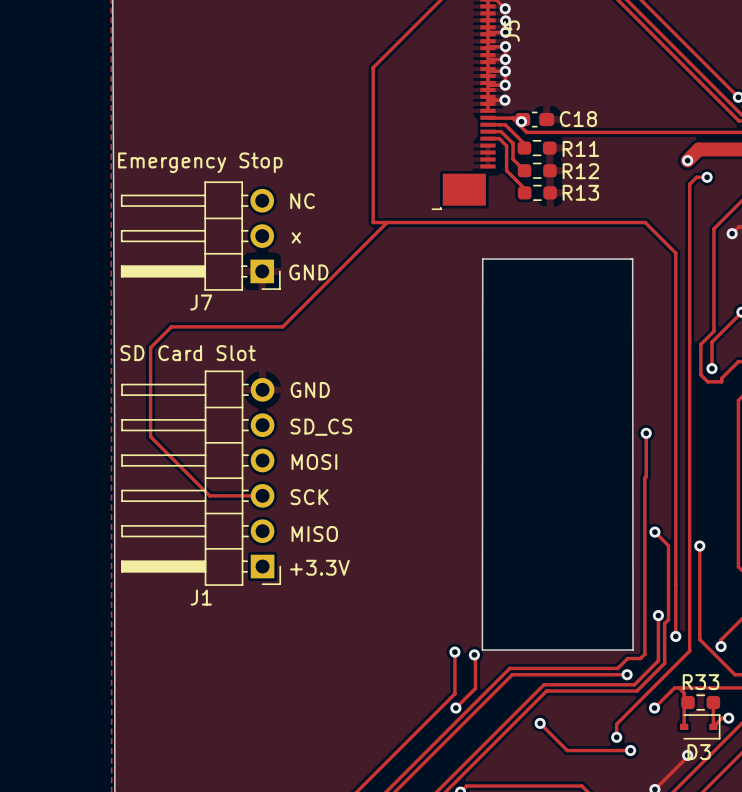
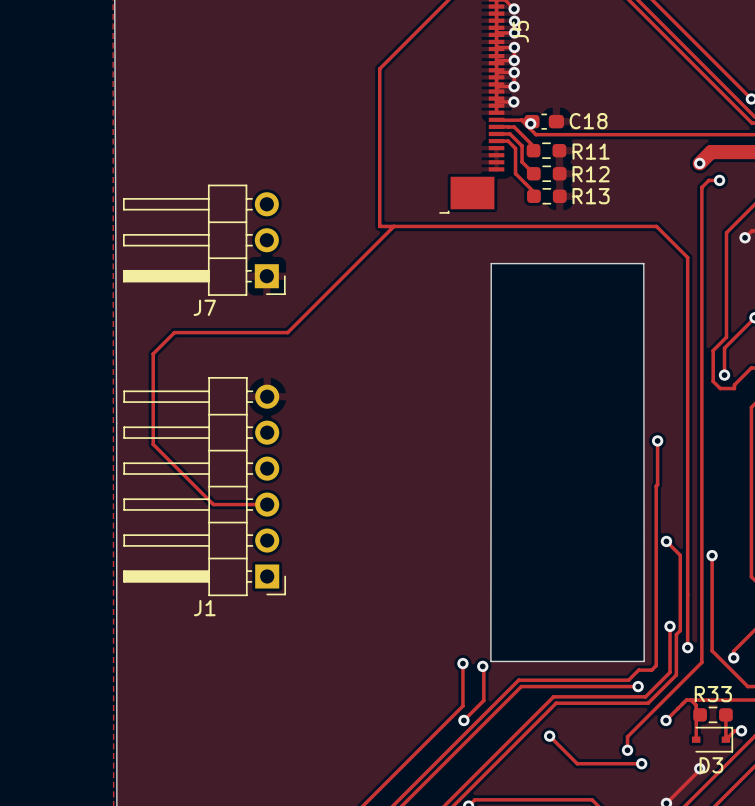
text: Emergency Stop (200, 162) -> none
text: NC (302, 201) -> none
text: x (296, 237) -> none
text: GND (308, 272) -> none
text: SD Card Slot (188, 353) -> none
text: GND (310, 390) -> none
text: SD_CS (321, 427) -> none
text: MOSI (314, 462) -> none
text: SCK (309, 497) -> none
text: MISO (314, 534) -> none
text: +3.3V (319, 567) -> none

